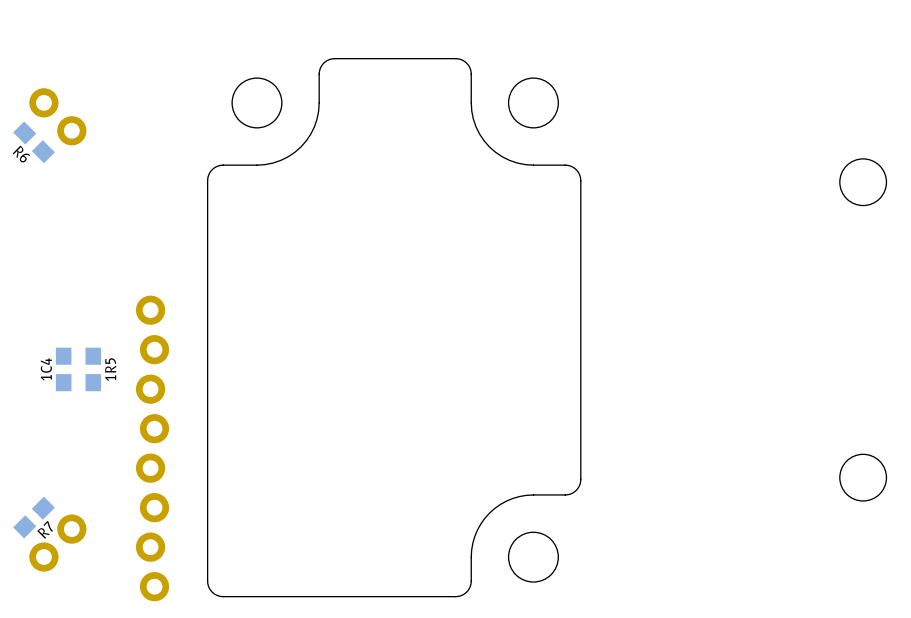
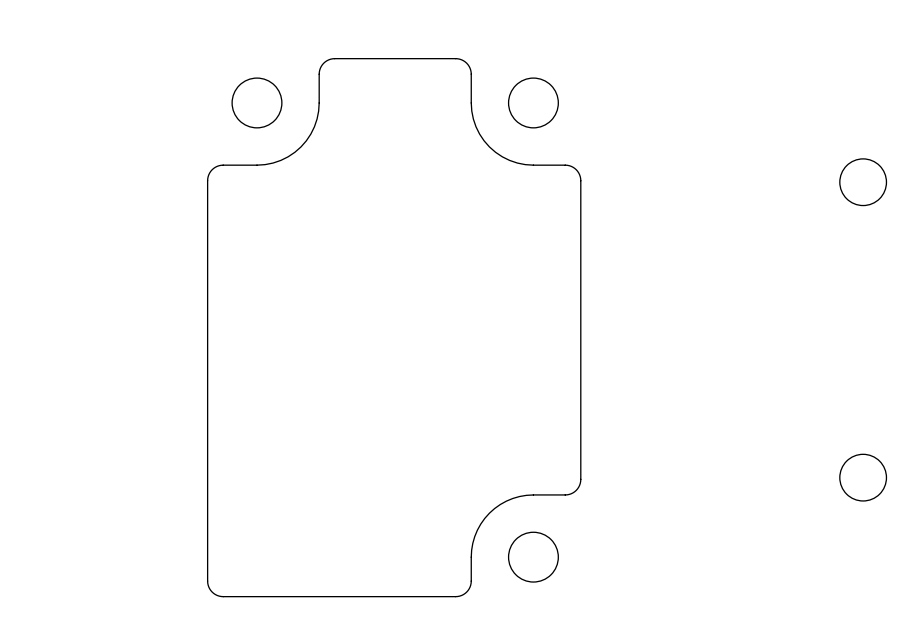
part: (57, 116) -> none
R6: (34, 142) -> none
1C4: (63, 369) -> none
1R5: (93, 369) -> none
part: (152, 448) -> none
R7: (34, 517) -> none
part: (57, 543) -> none

